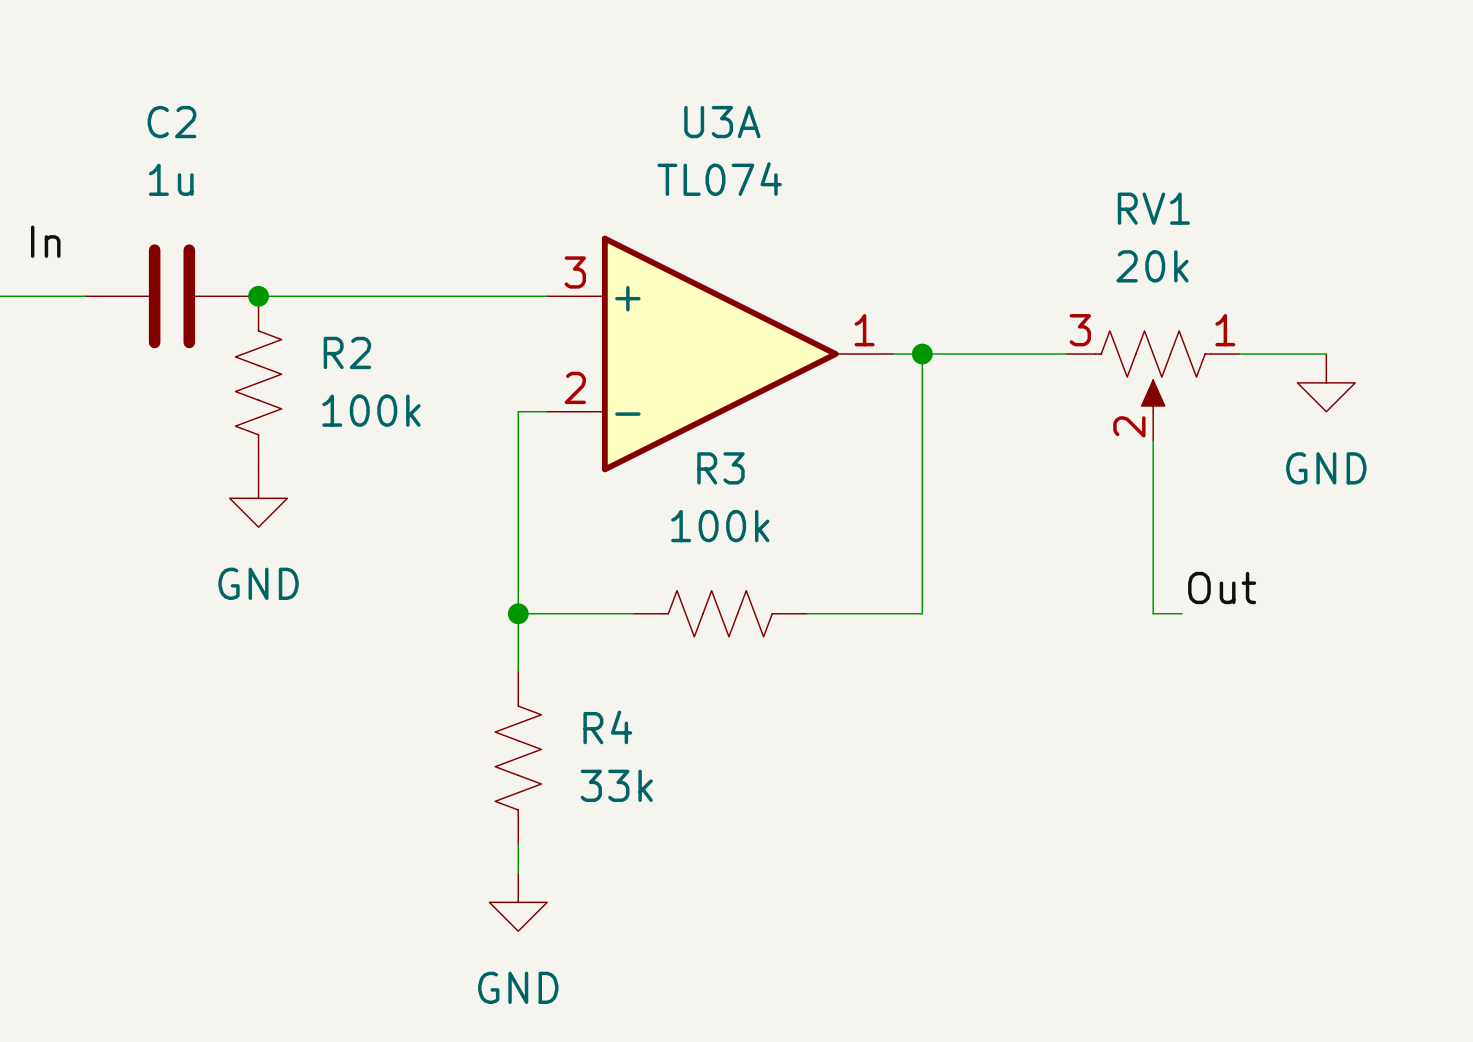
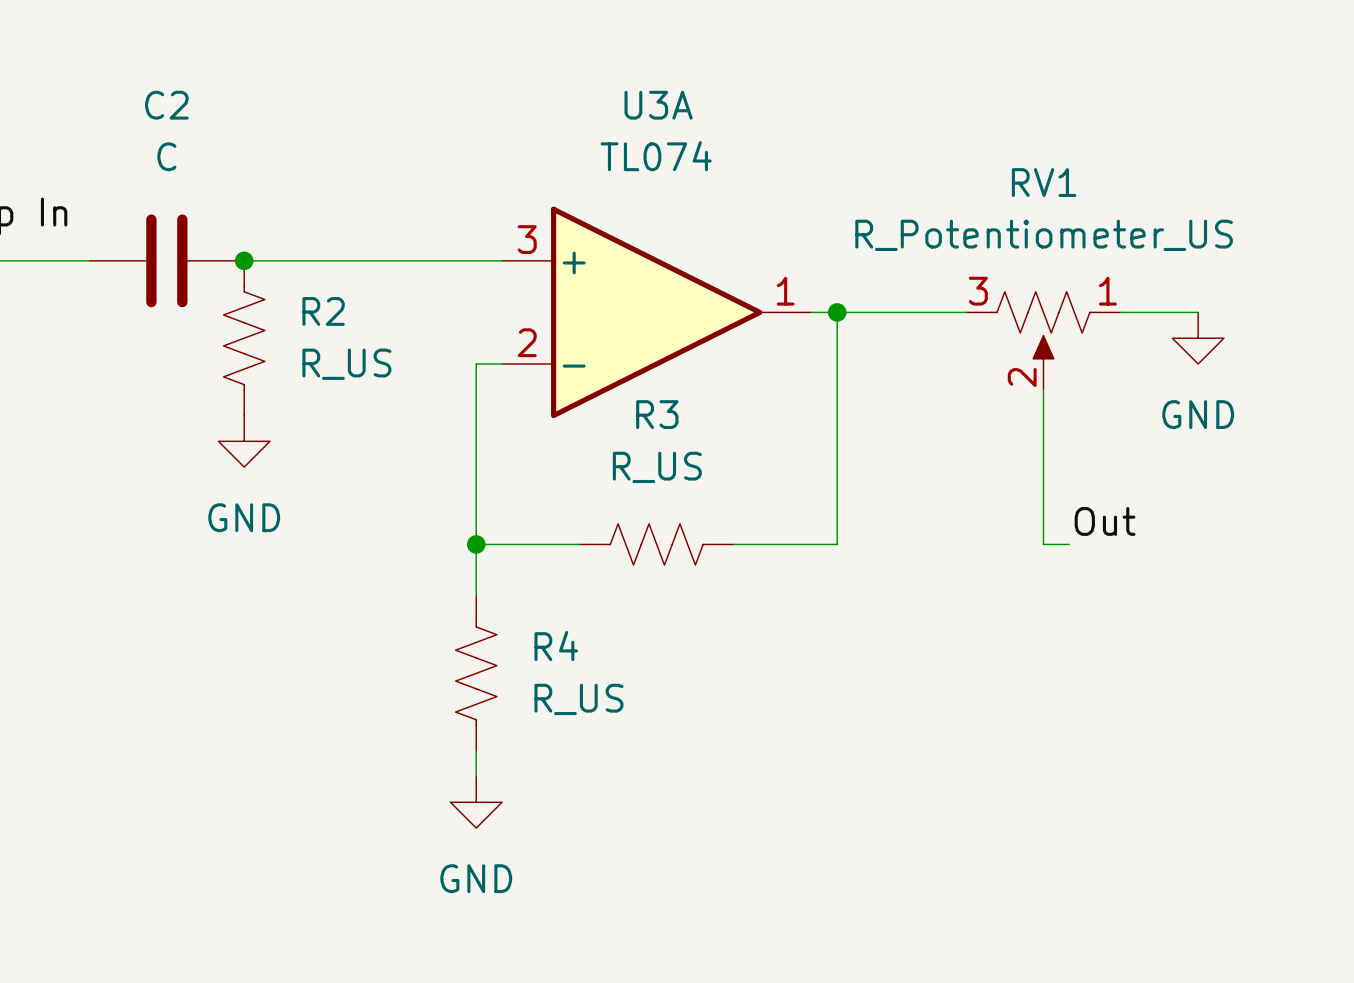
C2 value: 1u (171, 179) -> C (166, 156)
RV1 value: 20k (1152, 266) -> R_Potentiometer_US (1044, 235)
R2 value: 100k (371, 410) -> R_US (346, 364)
R3 value: 100k (720, 526) -> R_US (657, 467)
R4 value: 33k (616, 785) -> R_US (578, 699)

